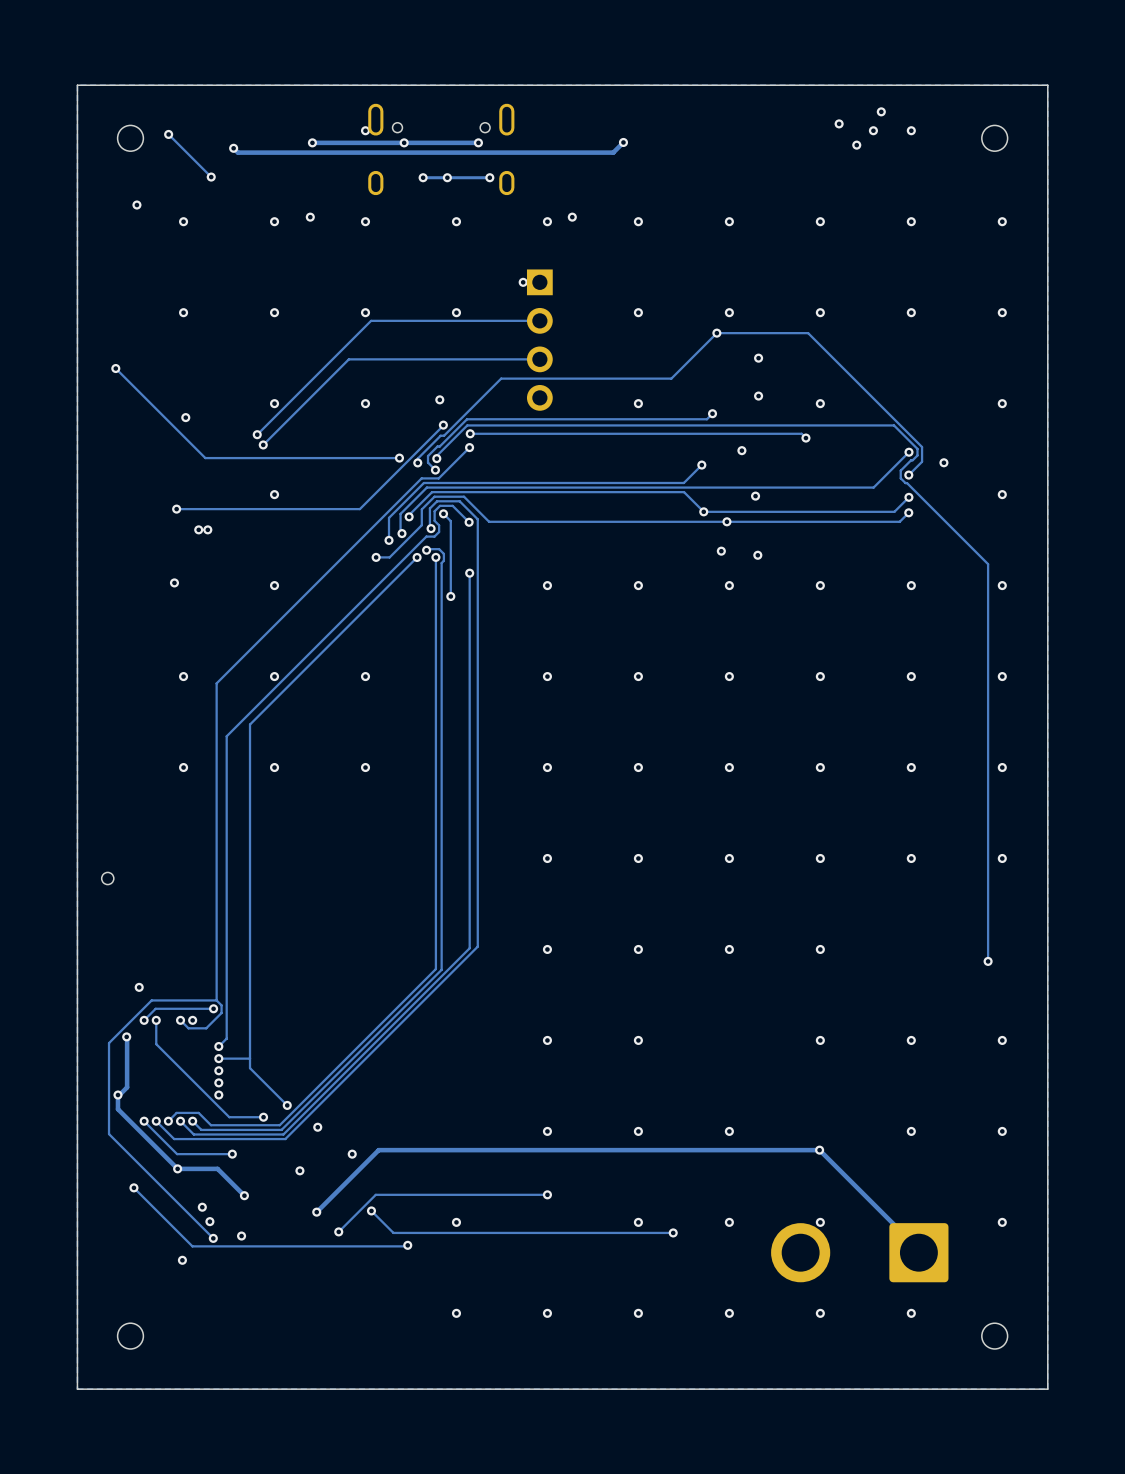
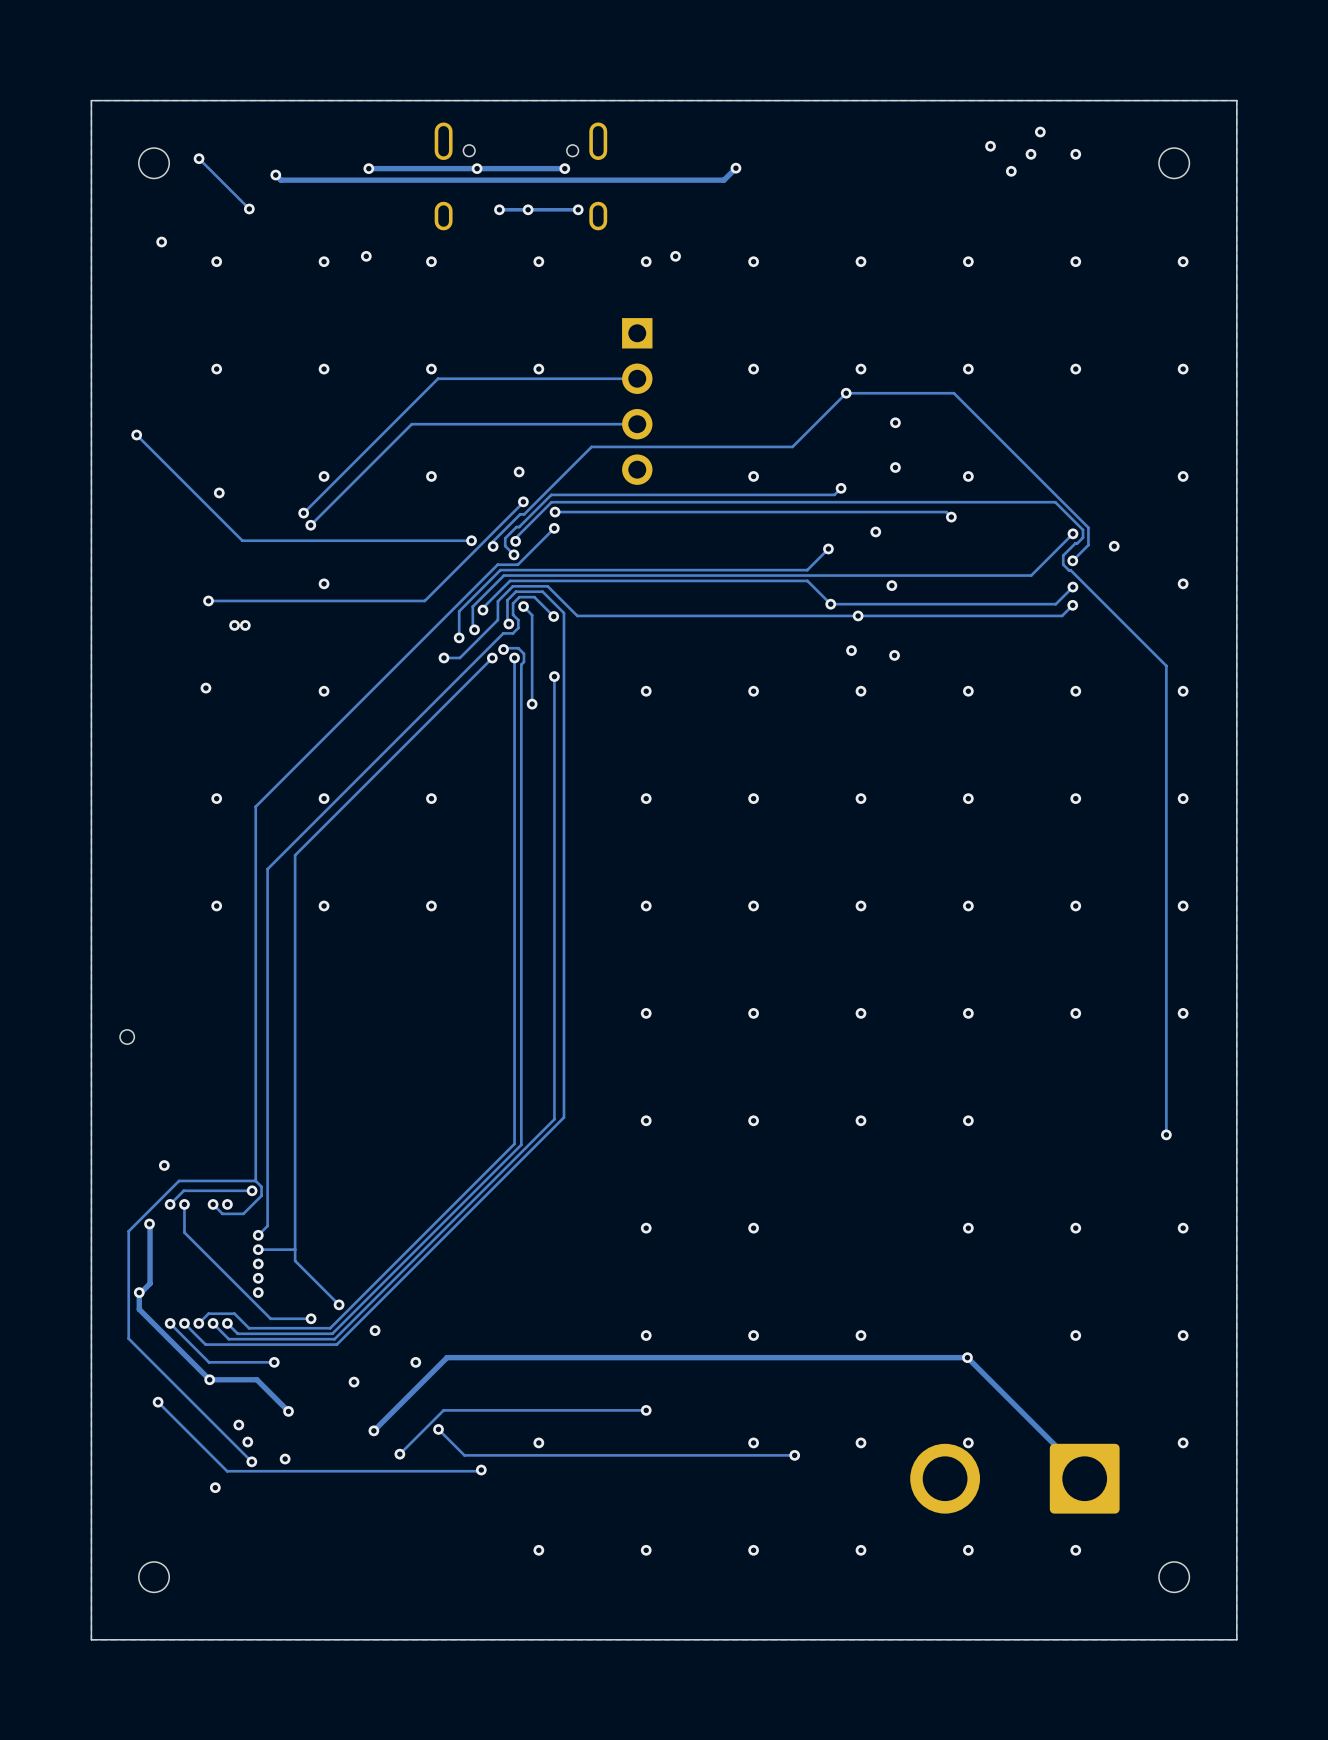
via: (365, 130) -> none
via: (523, 282) -> none

